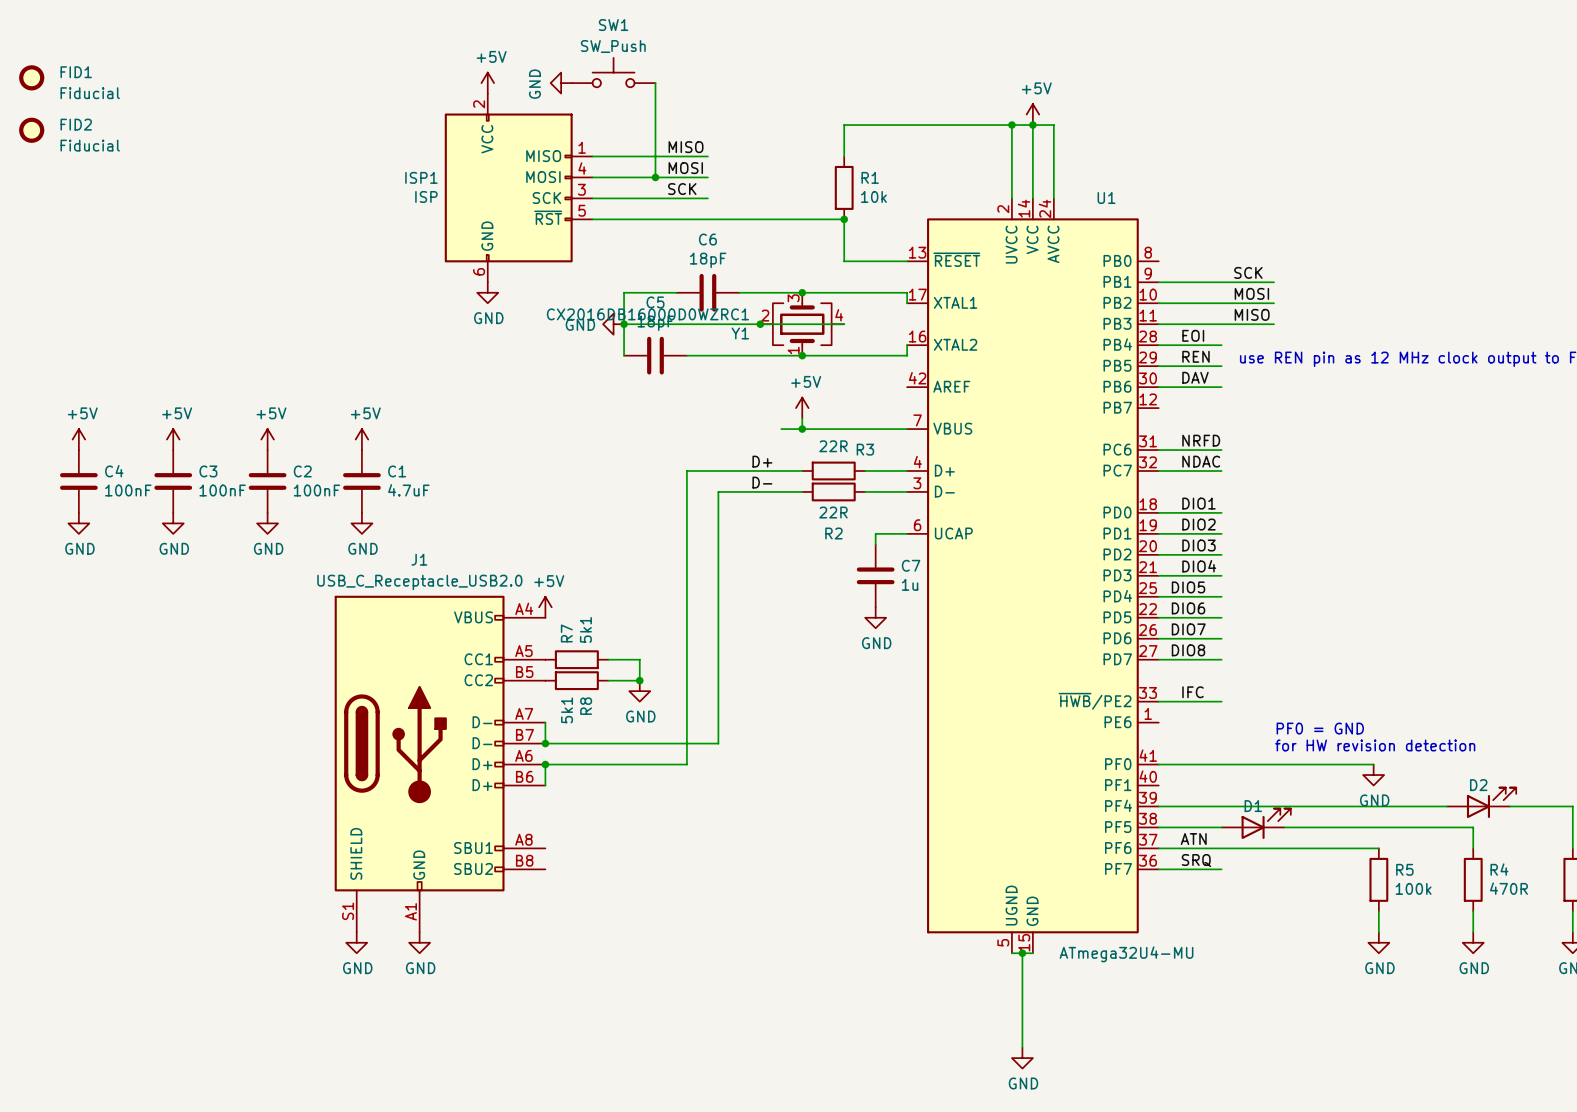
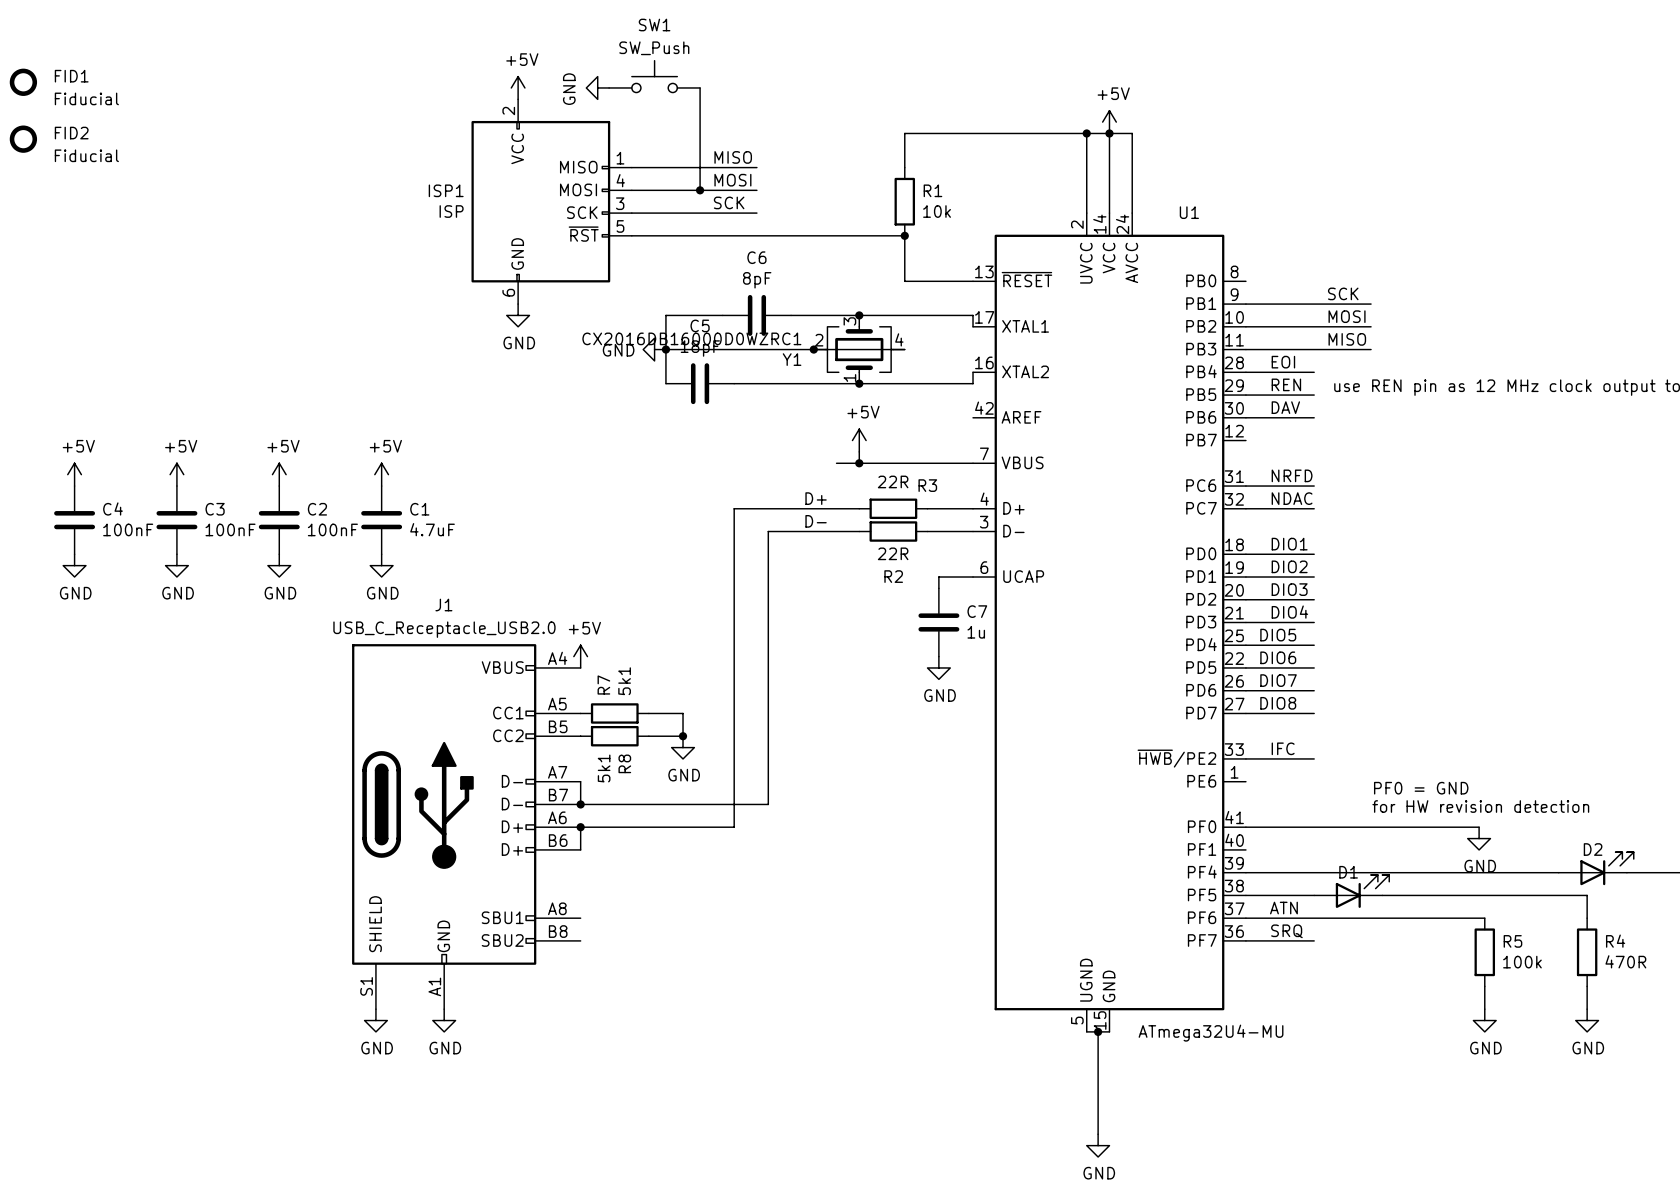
C6 value: 18pF (708, 260) -> 8pF (757, 280)

